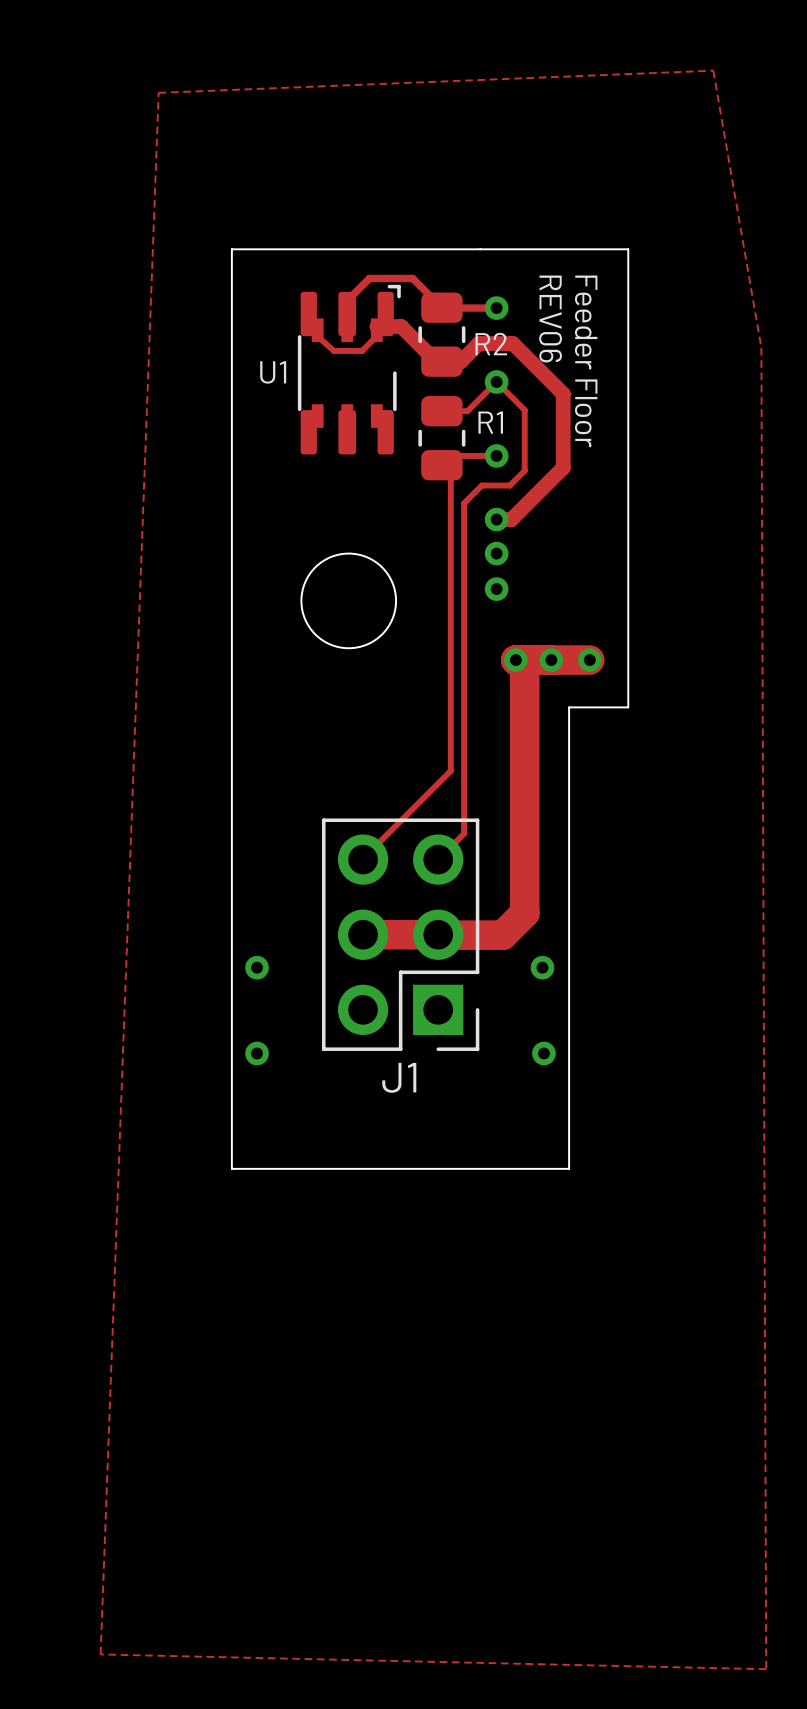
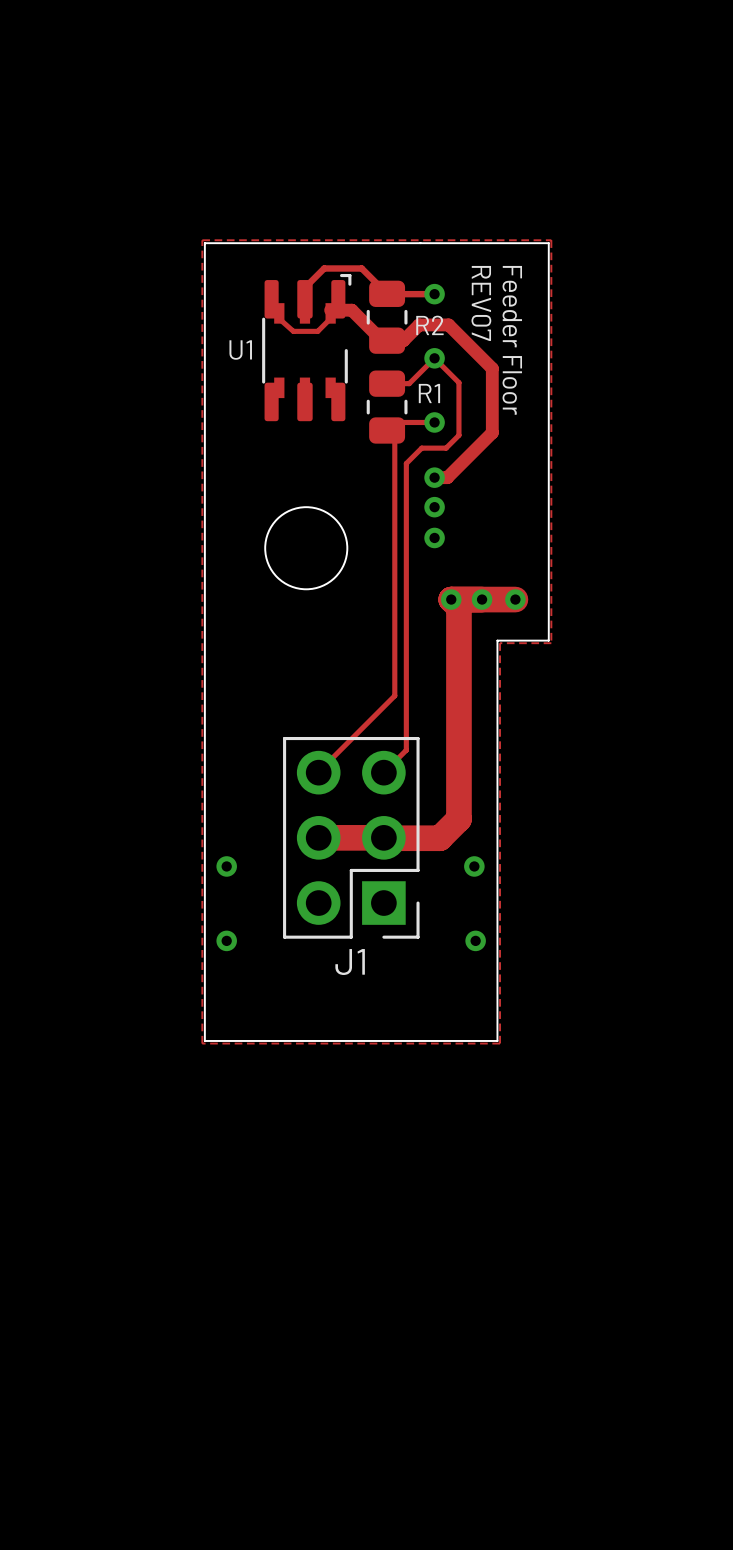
zone outline: (713, 70) (158, 92) (100, 1654) (766, 1669) (761, 347) (713, 70) -> none
zone outline: none -> (202, 240) (202, 1043) (500, 1043) (500, 643) (551, 643) (551, 240) (202, 240)
text: REV06 (550, 318) -> REV07 (481, 303)

